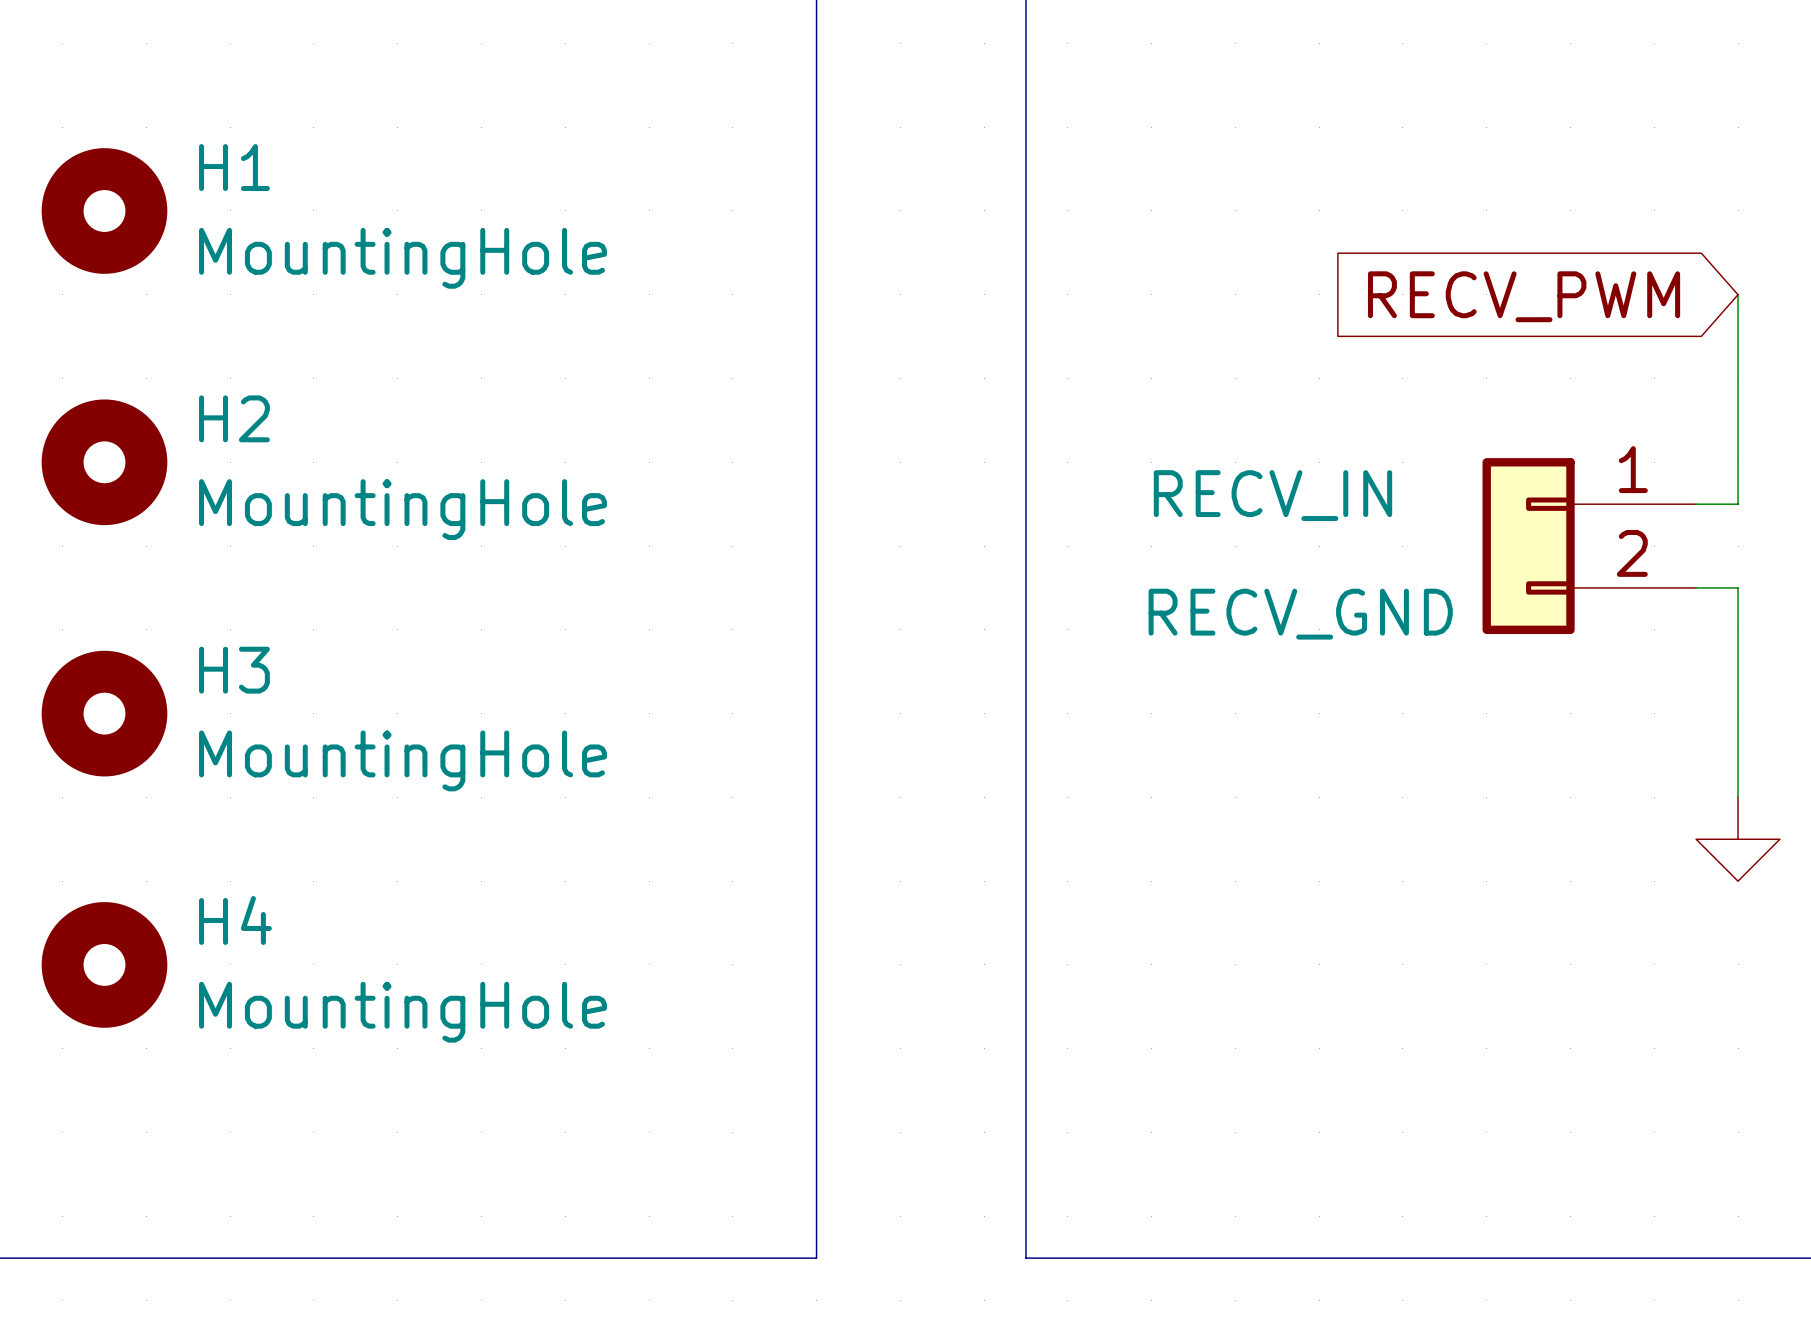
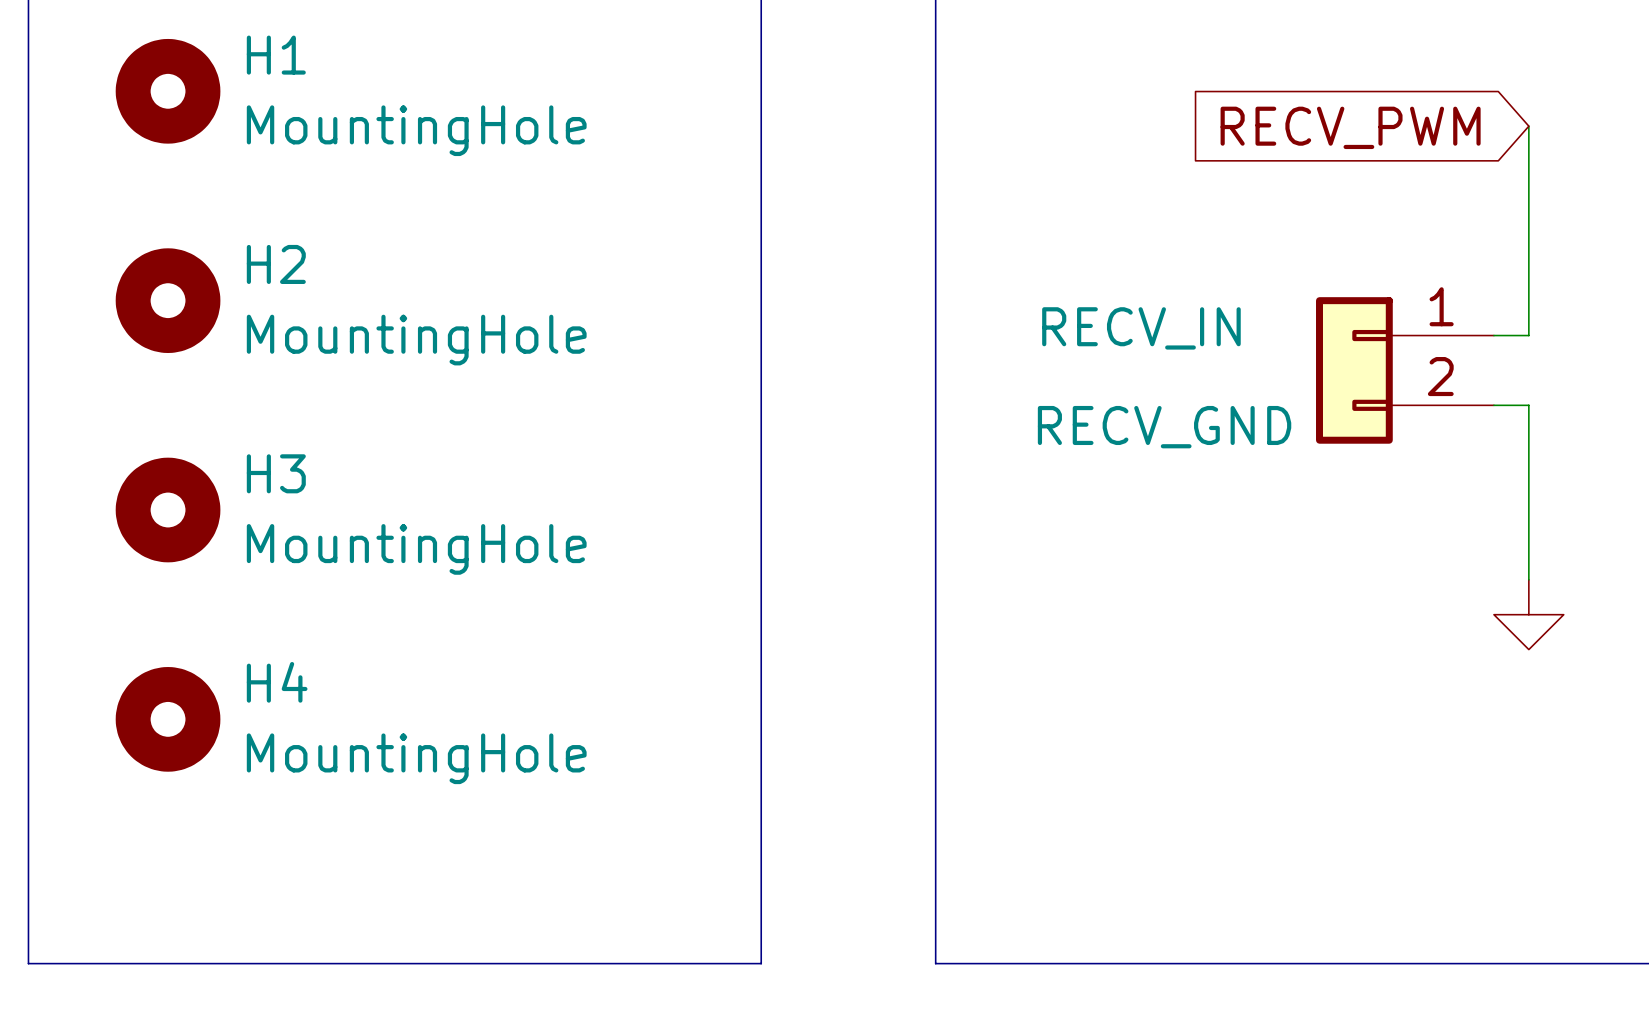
wire: none -> (1528, 126) (1528, 161)
global label position: RECV_PWM (1524, 296) -> RECV_PWM (1350, 127)

